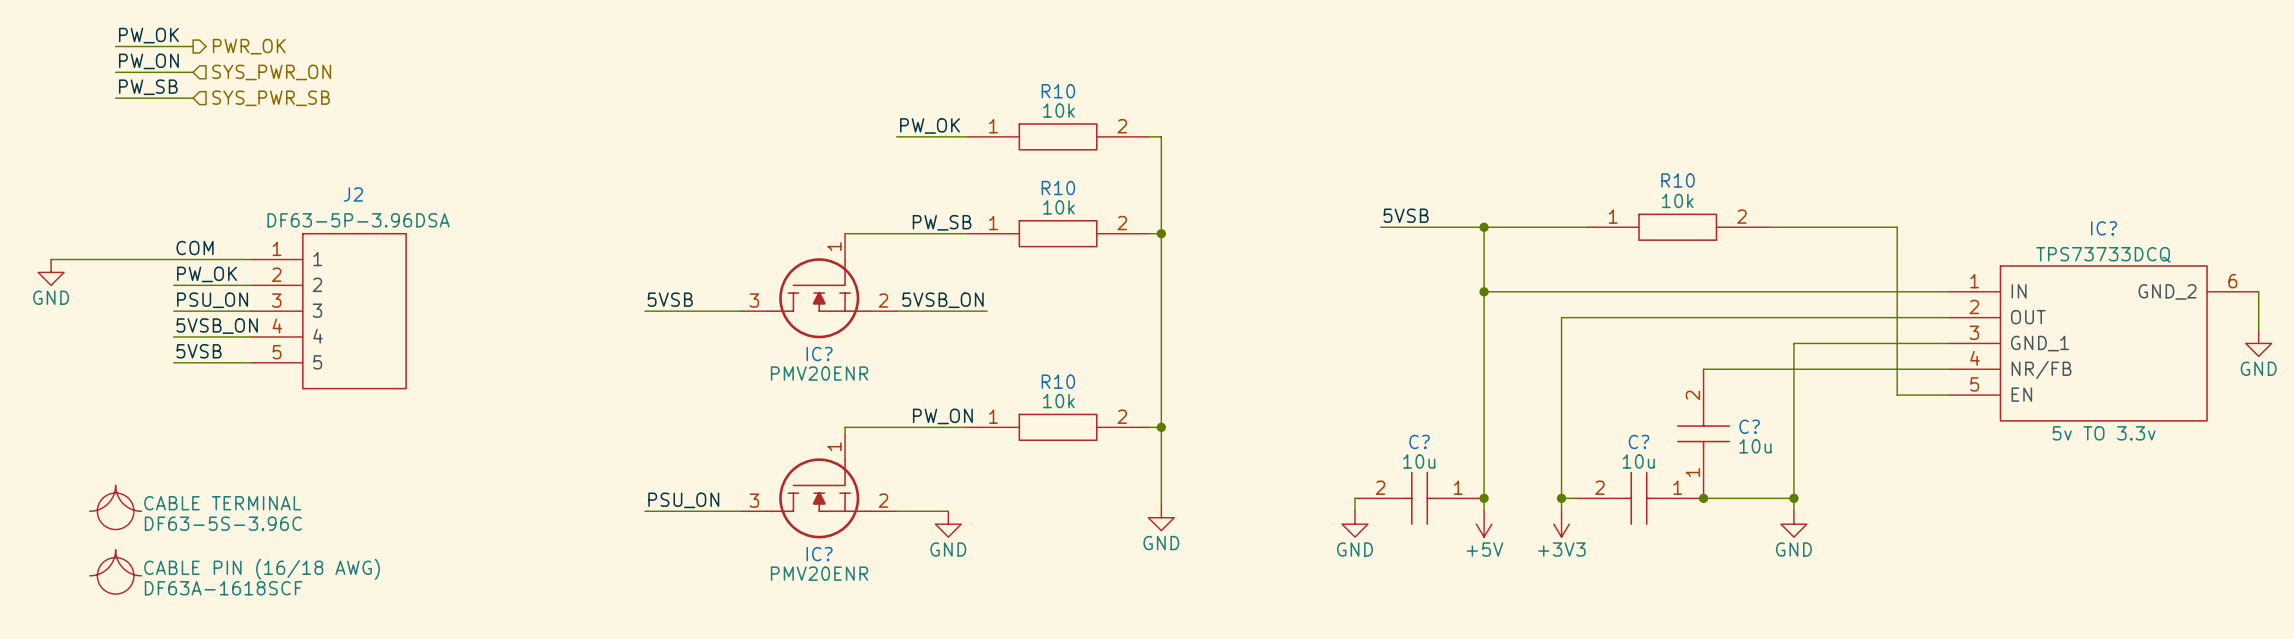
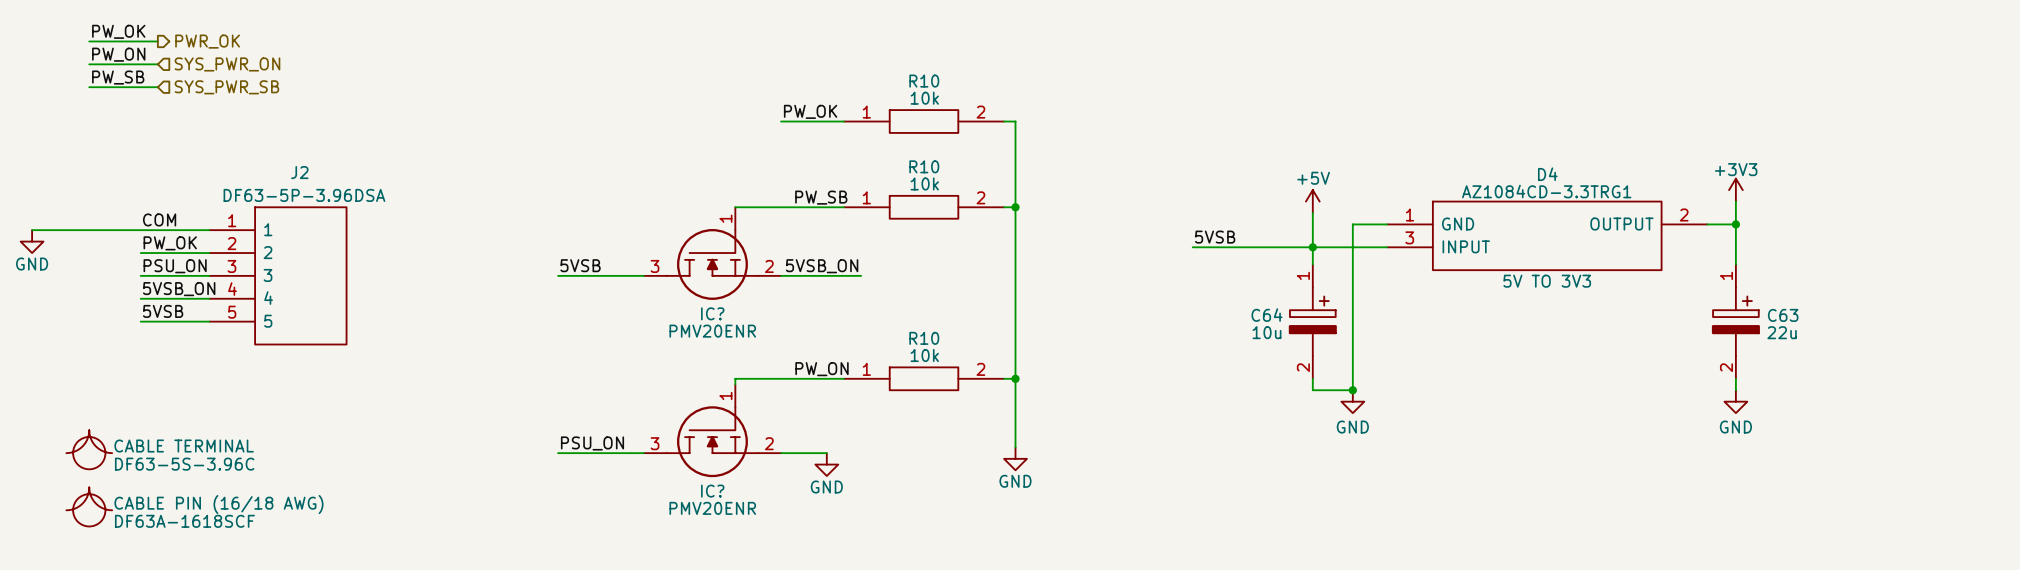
power symbol: none -> +3V3 (1735, 190)
label position: 5VSB (1406, 215) -> 5VSB (1215, 237)
wire: (1380, 227) (1587, 227) -> none
wire: (1484, 227) (1484, 511) -> none
junction: (1484, 227) -> none
power symbol: none -> +5V (1312, 201)
R10: 10k (1677, 227) -> none
wire: (1768, 227) (1897, 227) (1897, 395) (1948, 395) -> none
wire: none -> (1735, 201) (1735, 264)
wire: none -> (1312, 213) (1312, 264)
wire: none -> (1387, 224) (1352, 224) (1352, 390) (1312, 390) (1312, 378)
wire: none -> (1707, 224) (1735, 224)
junction: none -> (1735, 224)
D4: none -> AZ1084CD-3.3TRG1 (1547, 235)
wire: none -> (1192, 247) (1387, 247)
wire: (1484, 291) (1948, 291) -> none
junction position: (1484, 291) -> (1312, 247)
wire: (2258, 291) (2258, 330) -> none
wire: (1948, 317) (1561, 317) (1561, 511) -> none
wire: (1948, 343) (1793, 343) (1793, 511) -> none
IC?: TPS73733DCQ (2103, 343) -> none
power symbol: GND (2258, 343) -> none
C64: none -> 10u (1312, 321)
C63: none -> 22u (1735, 321)
wire: (1703, 369) (1948, 369) -> none
wire: none -> (1735, 378) (1735, 390)
C?: 10u (1703, 433) -> none
junction: none -> (1352, 390)
power symbol: none -> GND (1352, 401)
power symbol: none -> GND (1735, 401)
wire: (1354, 498) (1354, 511) -> none
C?: 10u (1419, 498) -> none
junction: (1484, 498) -> none
wire: (1561, 498) (1574, 498) -> none
junction: (1561, 498) -> none
C?: 10u (1639, 498) -> none
wire: (1703, 498) (1793, 498) -> none
junction: (1703, 498) -> none
junction: (1793, 498) -> none
power symbol: GND (1354, 524) -> none
power symbol: +5V (1484, 524) -> none
power symbol: +3V3 (1561, 524) -> none
power symbol: GND (1793, 524) -> none

